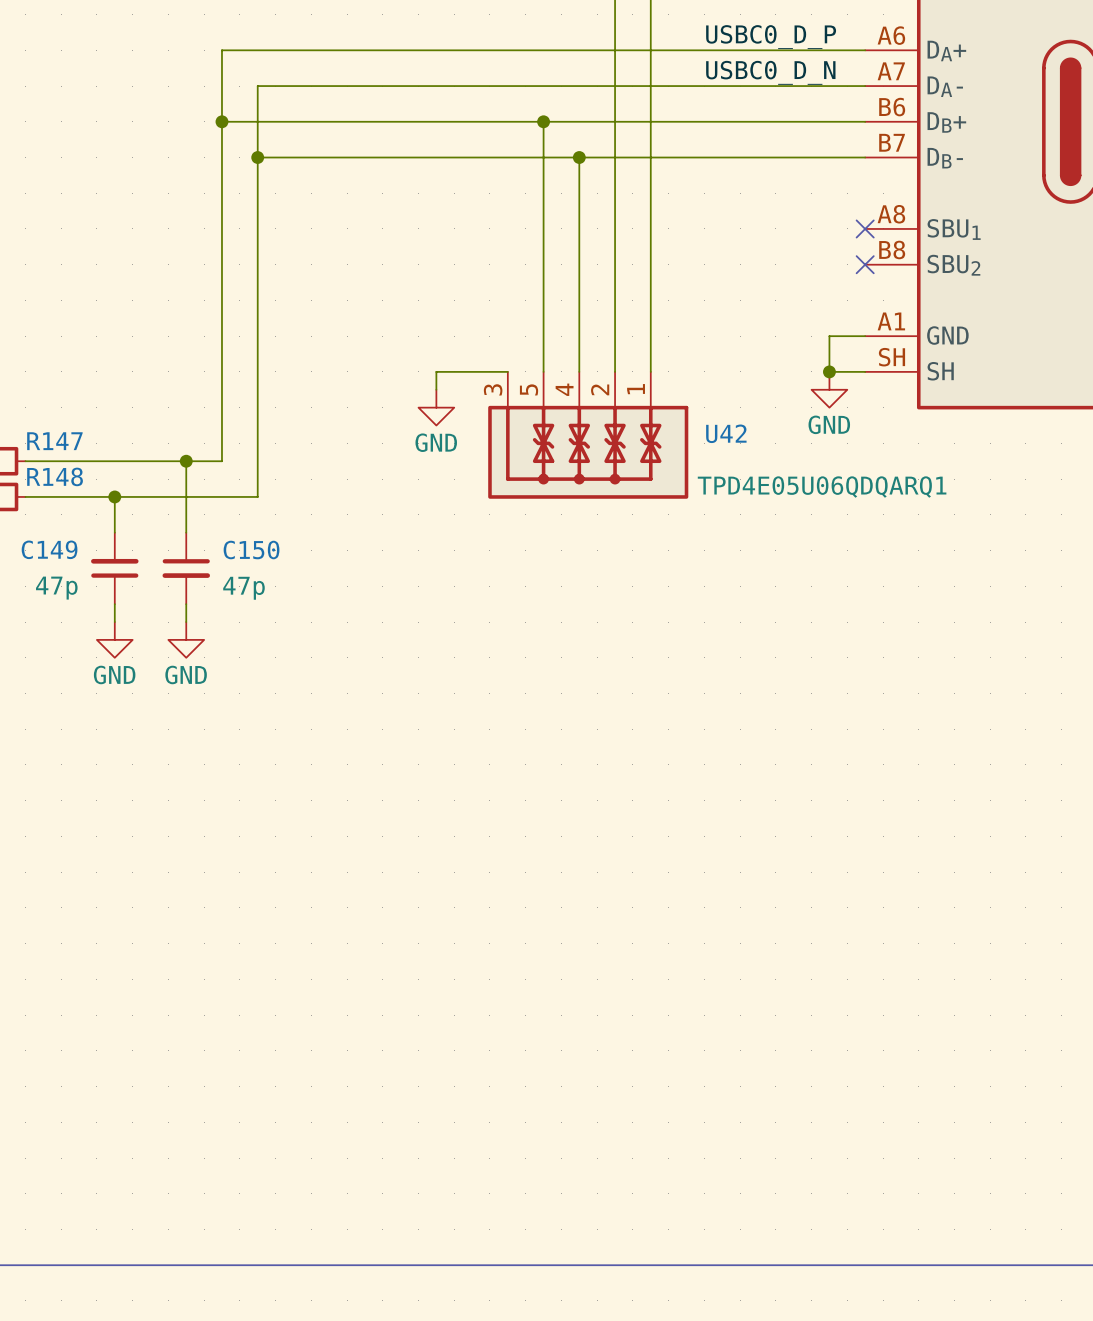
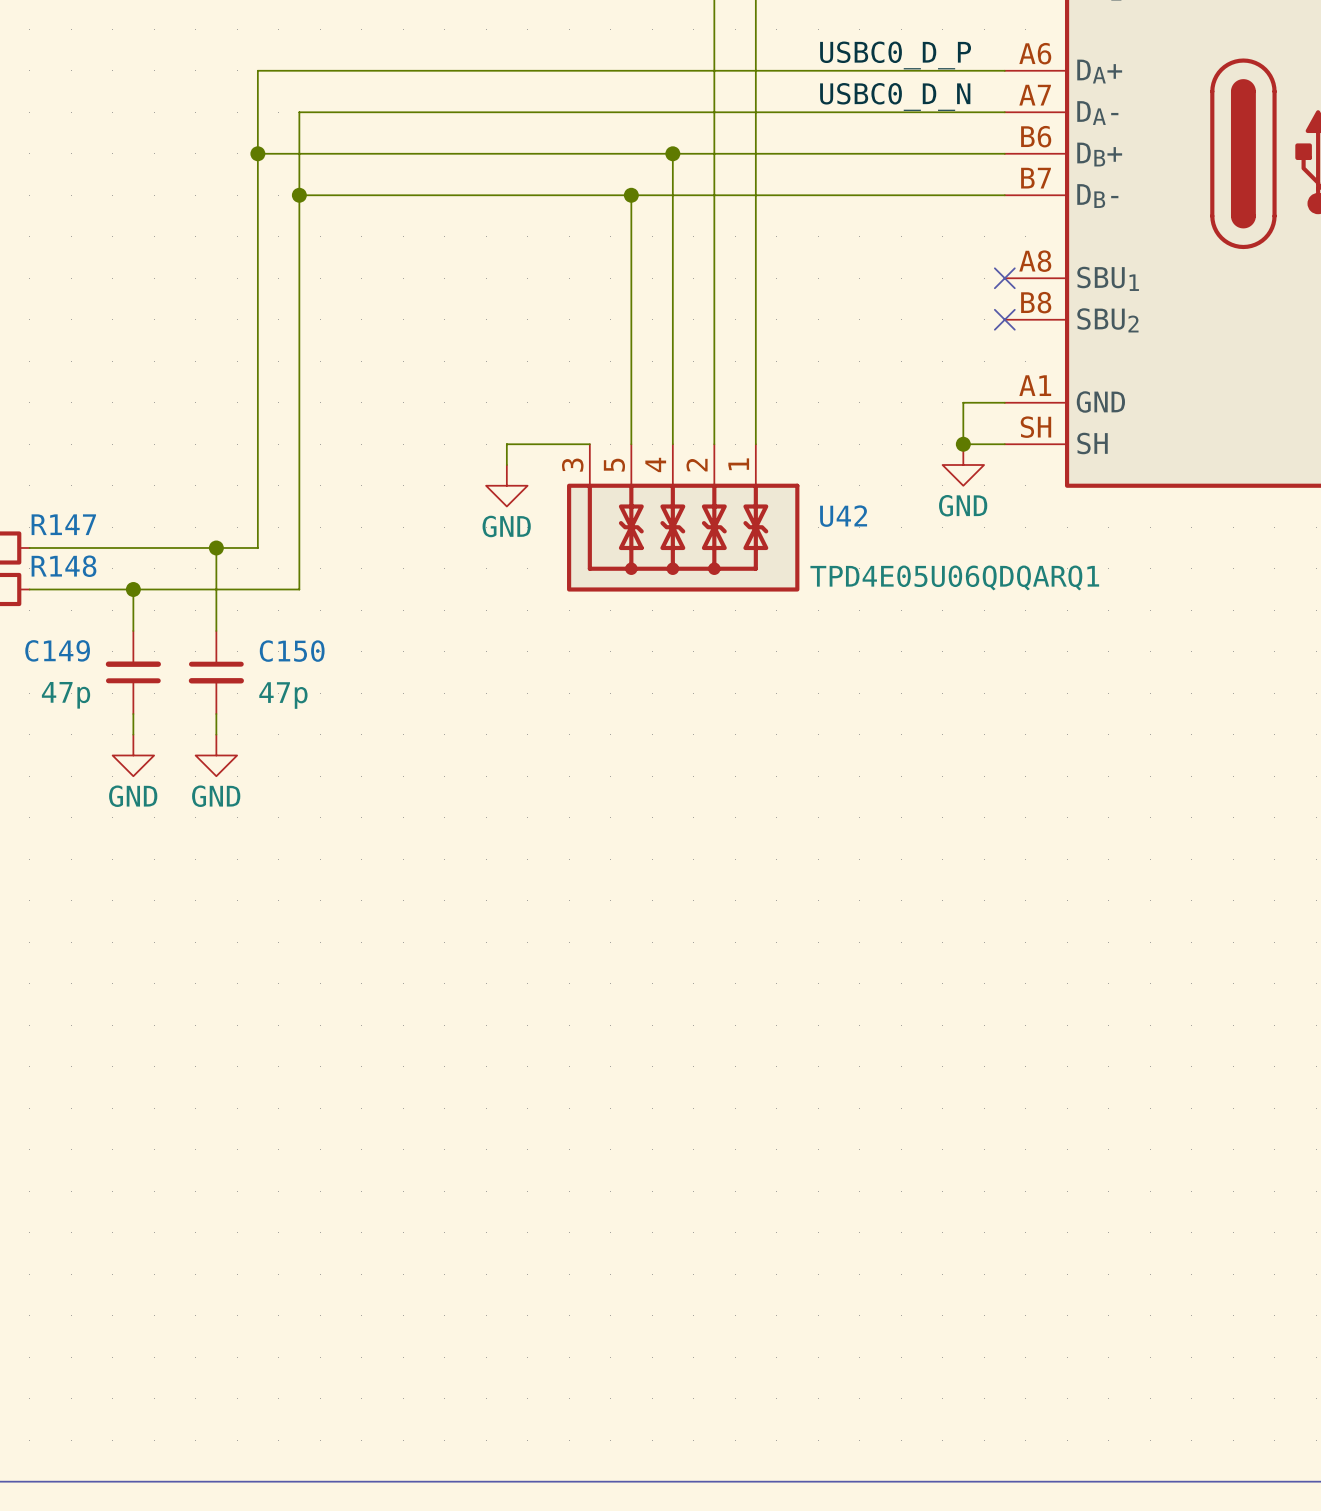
wire: (543, 121) (543, 157) -> (672, 153) (672, 195)
junction: (543, 121) -> none
junction: none -> (672, 153)
junction: none -> (631, 195)
junction: (579, 157) -> none

